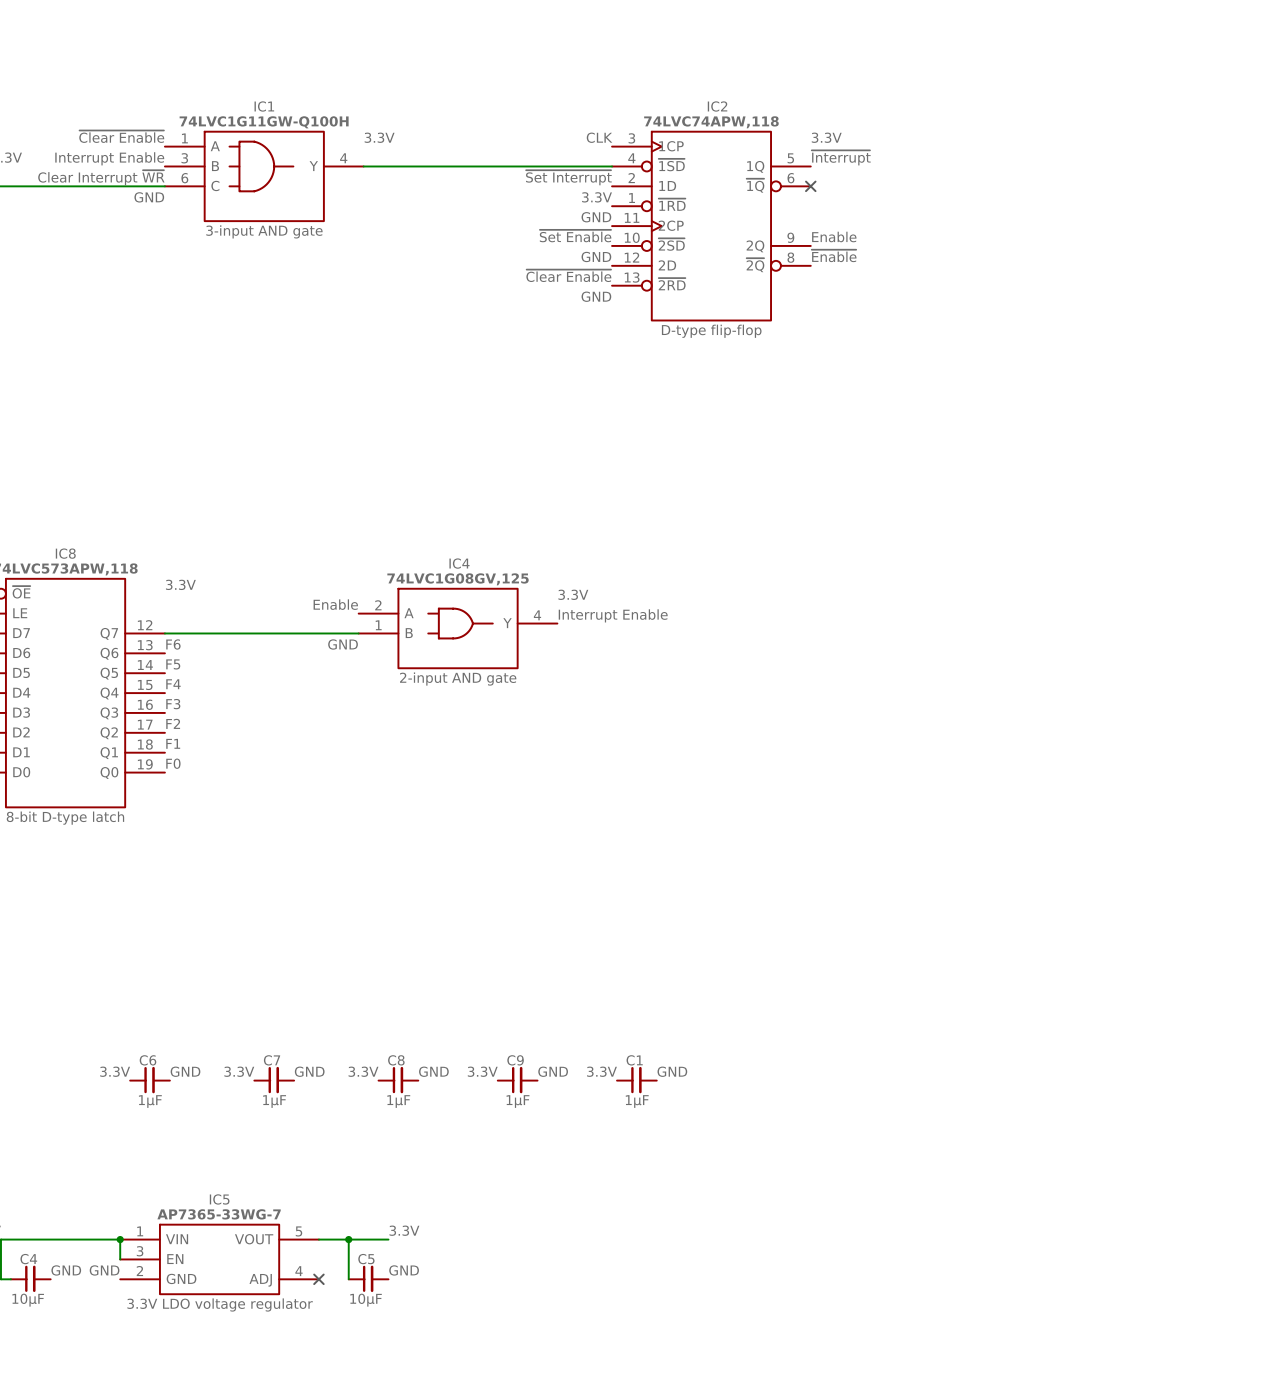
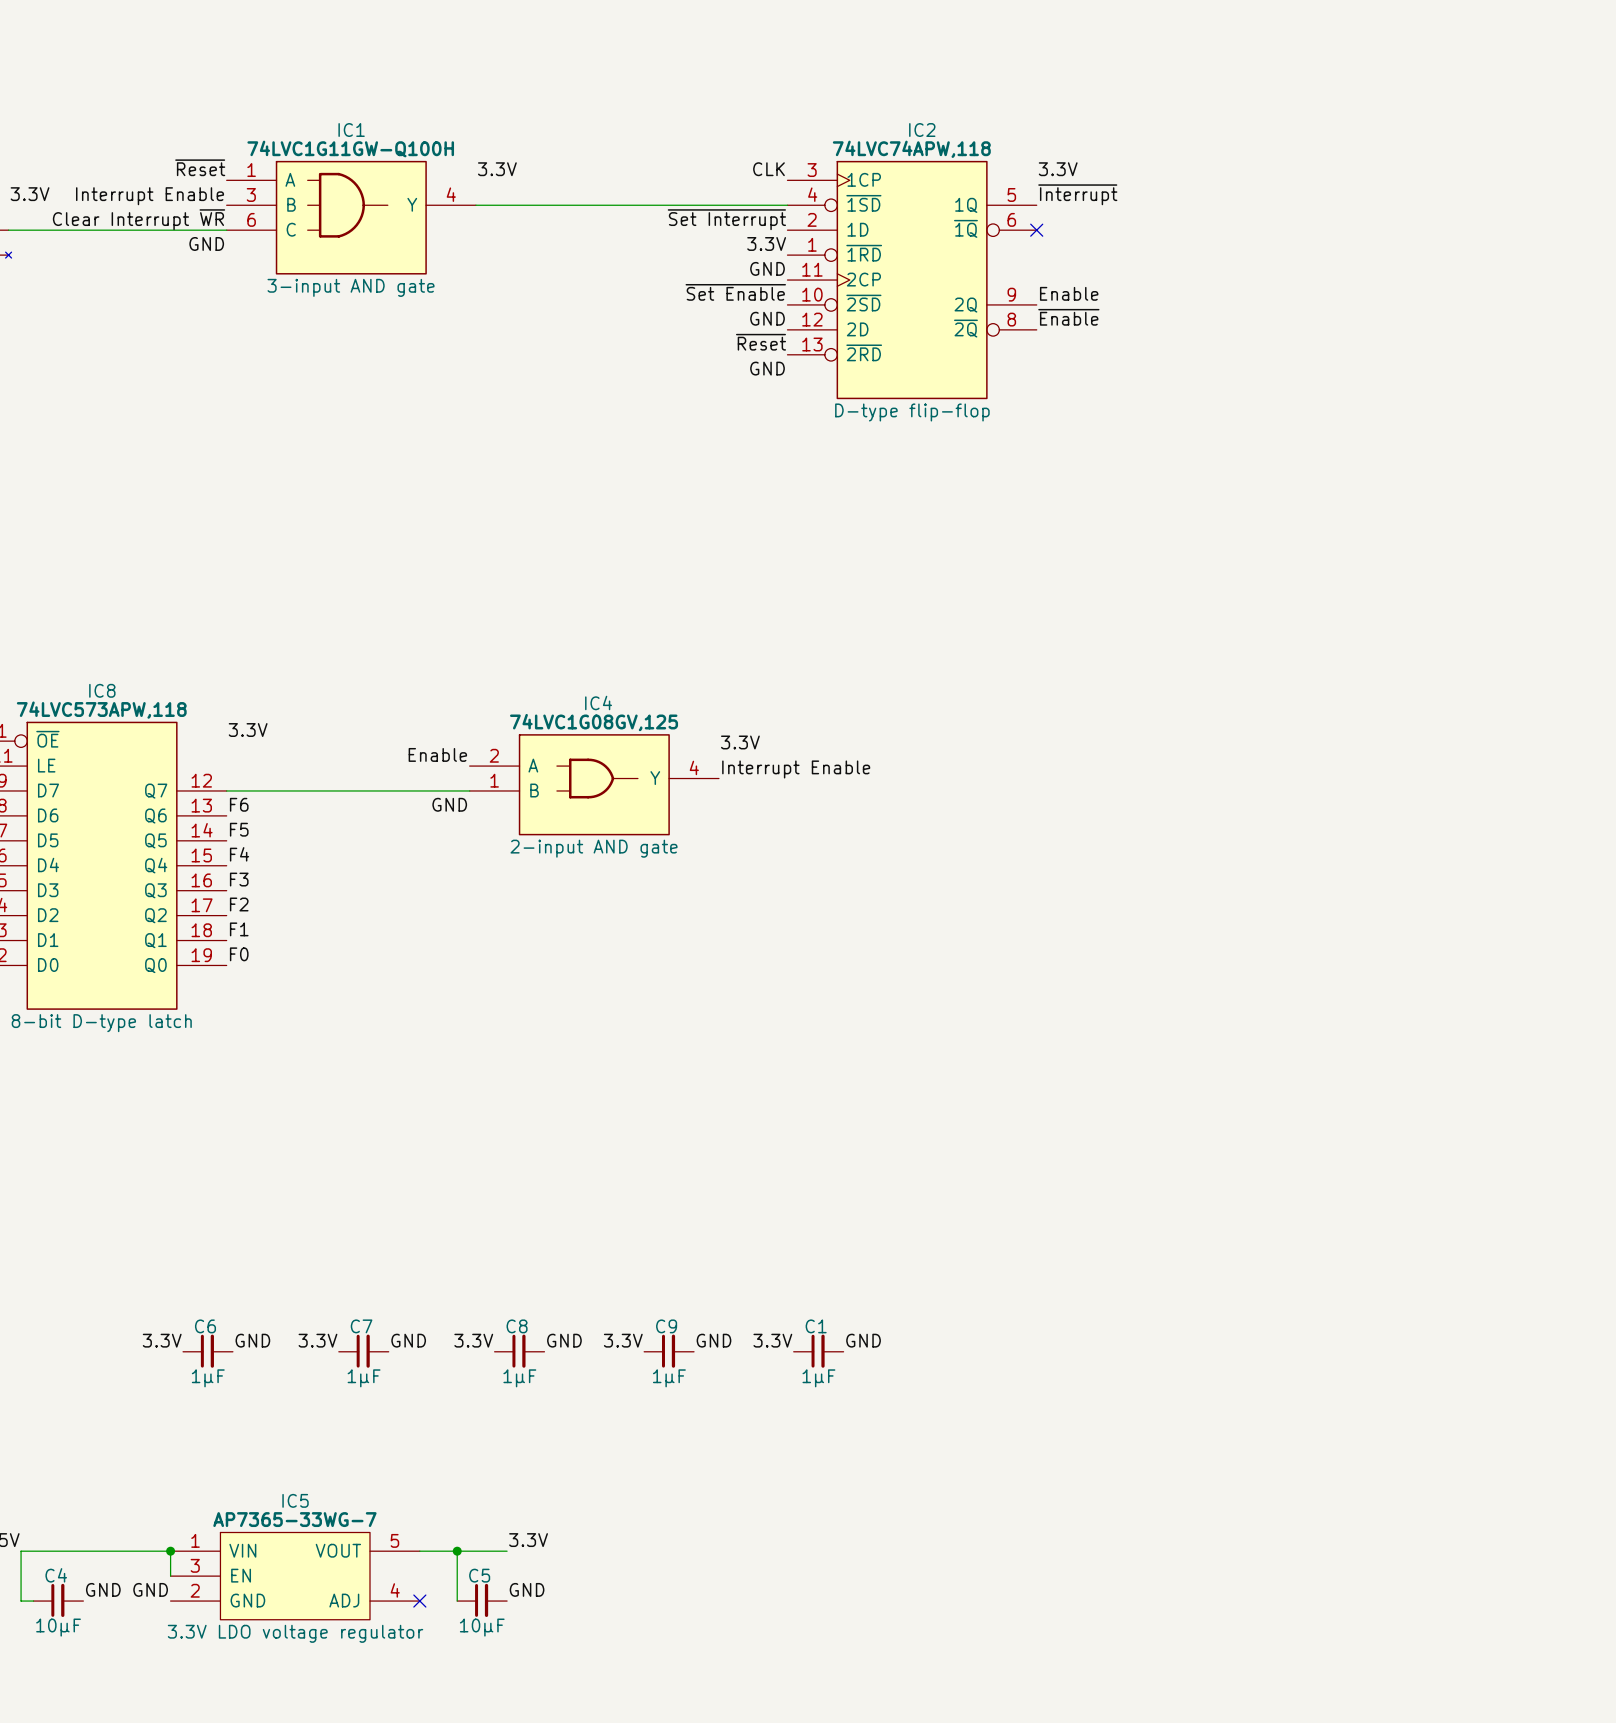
label: ~{Clear Enable} (121, 136) -> ~{Reset} (200, 167)
label: ~{Clear Enable} (568, 275) -> ~{Reset} (761, 342)

